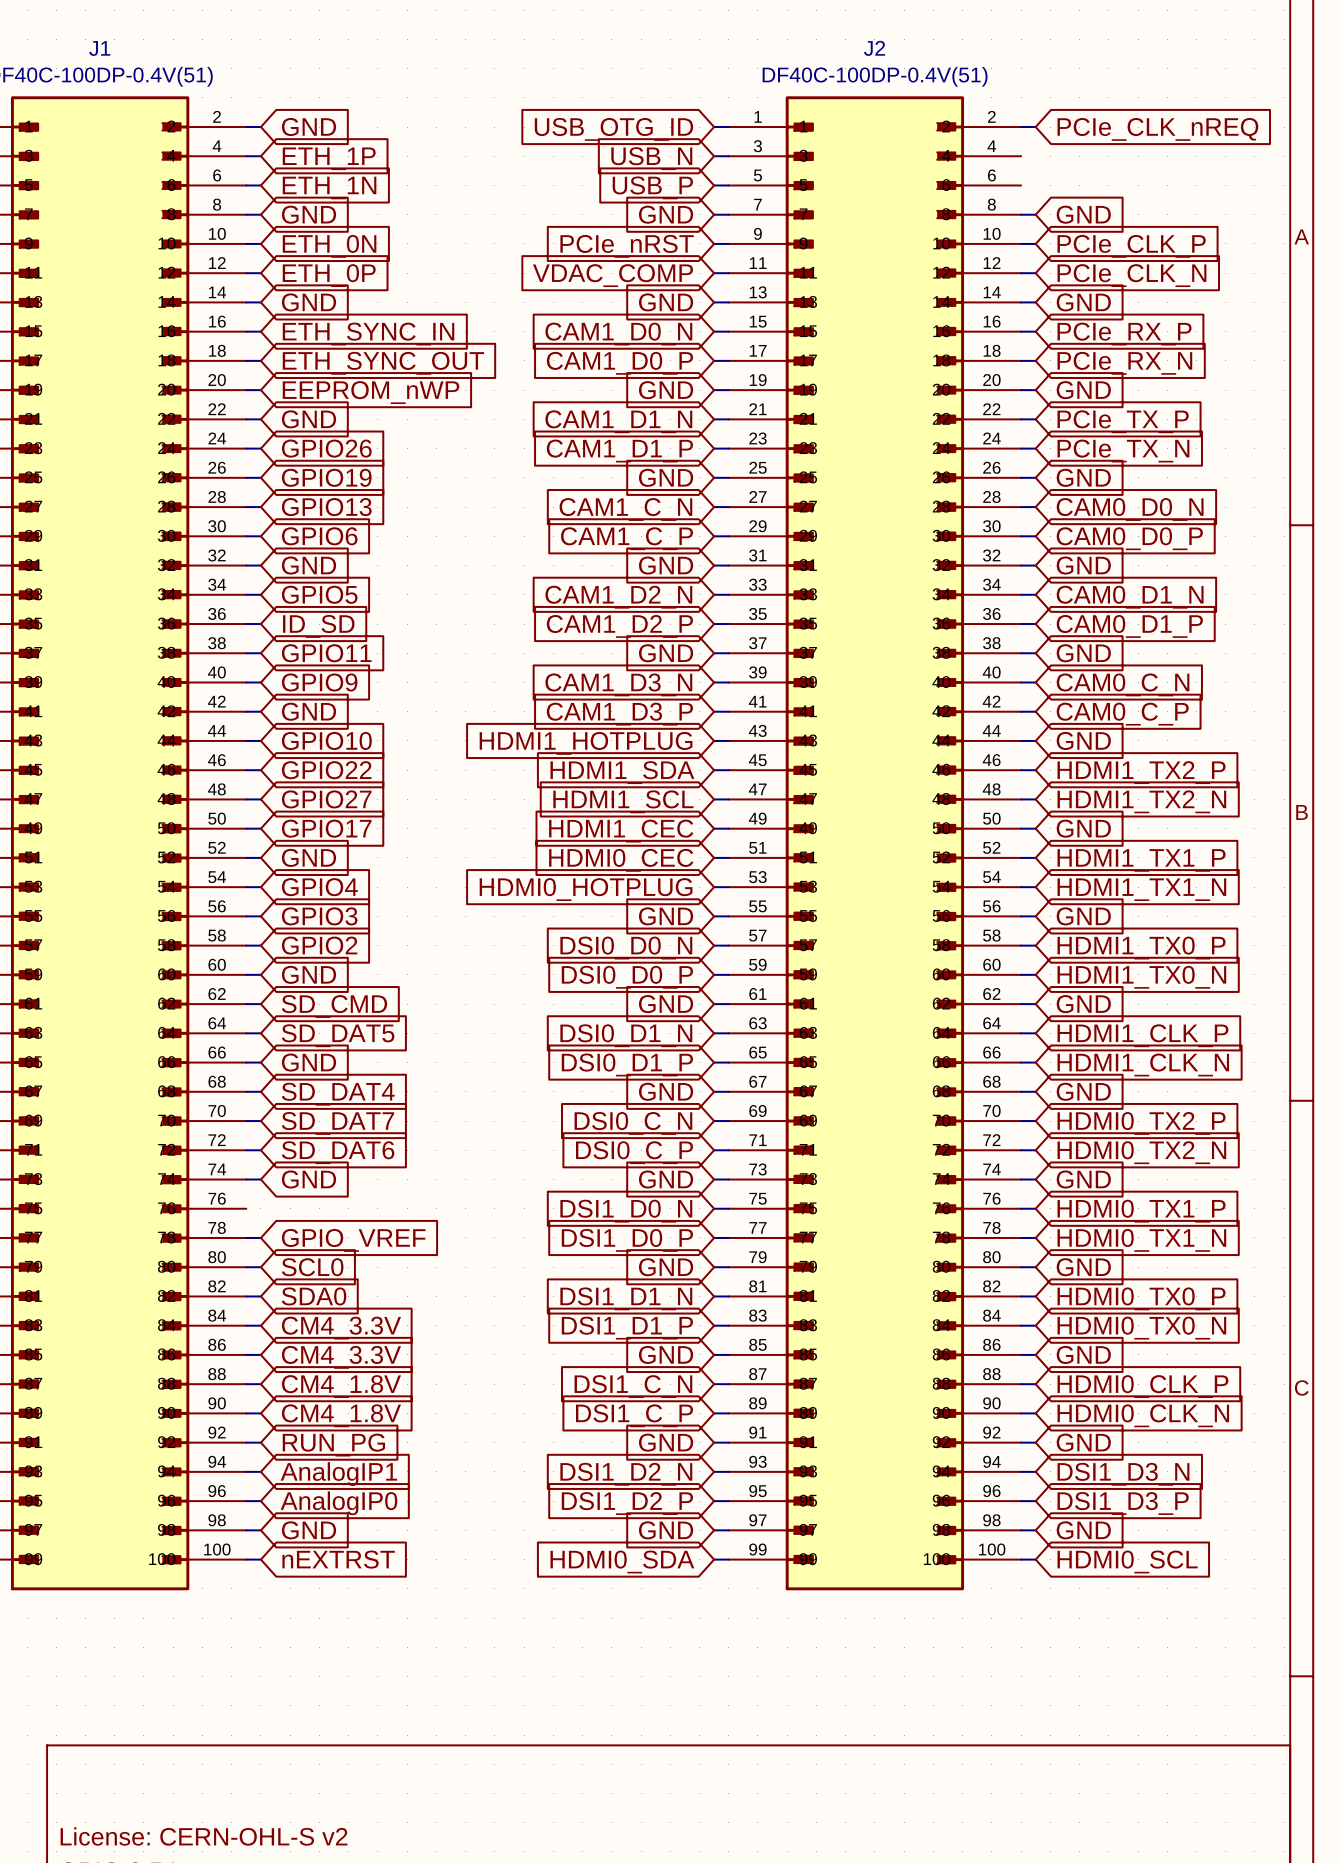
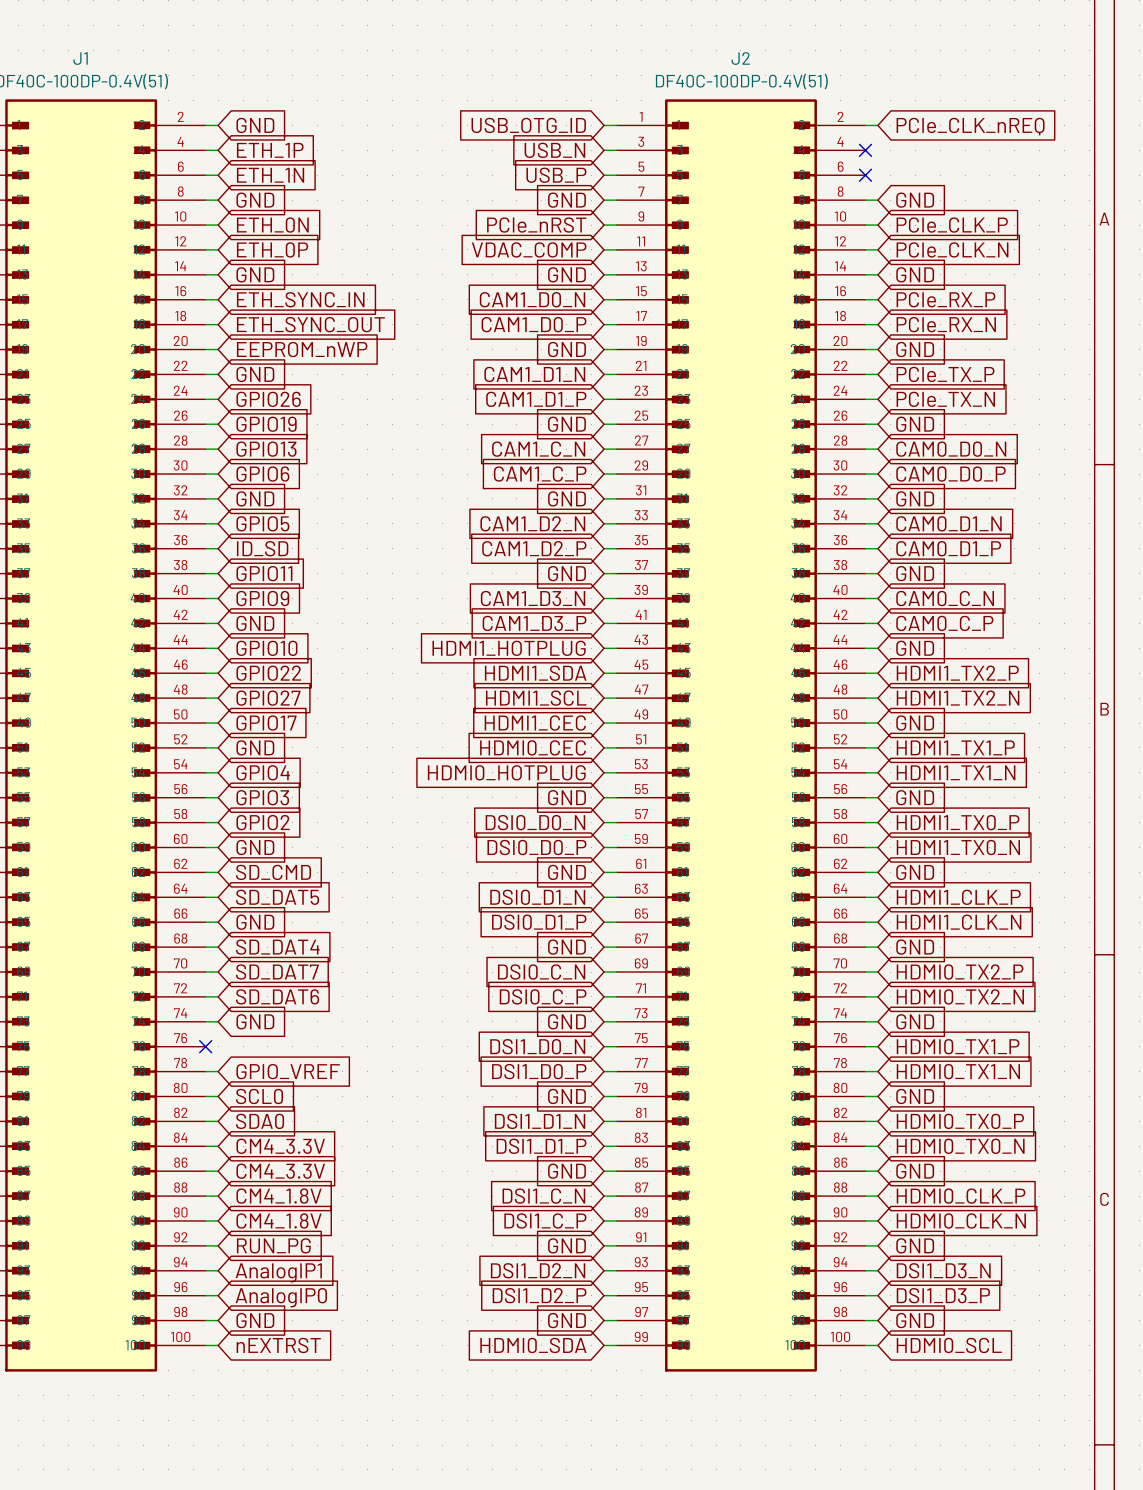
no-connect mark: none -> (865, 150)
no-connect mark: none -> (865, 175)
no-connect mark: none -> (205, 1046)

